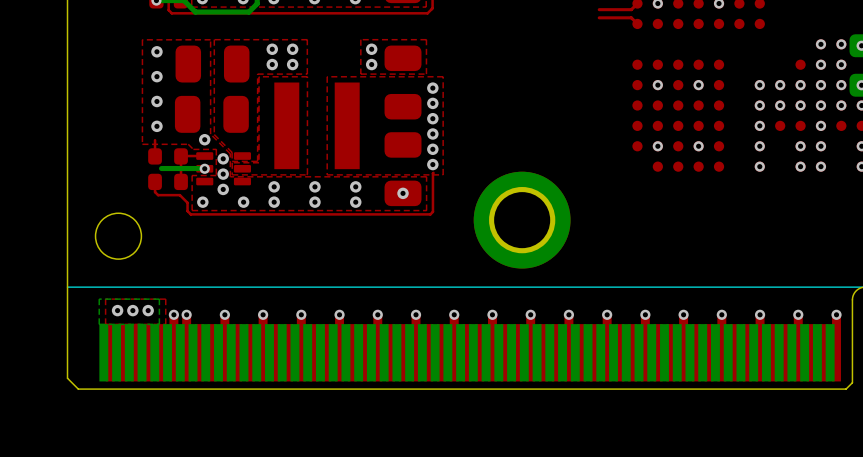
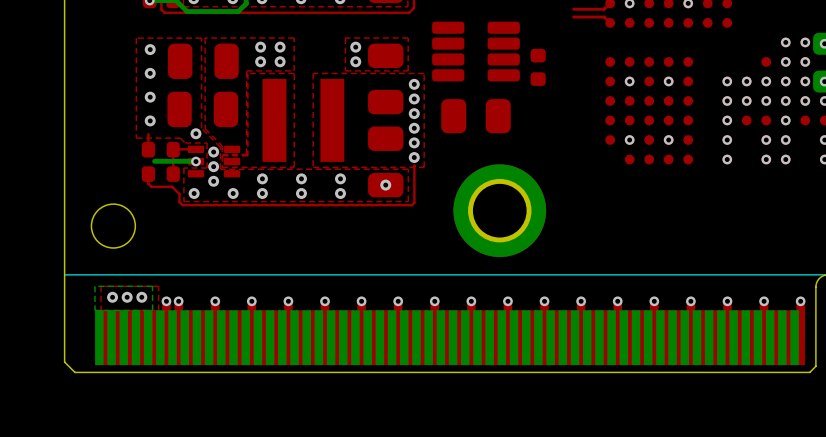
part: none -> (475, 51)
part: none -> (538, 67)
part: none -> (475, 116)

